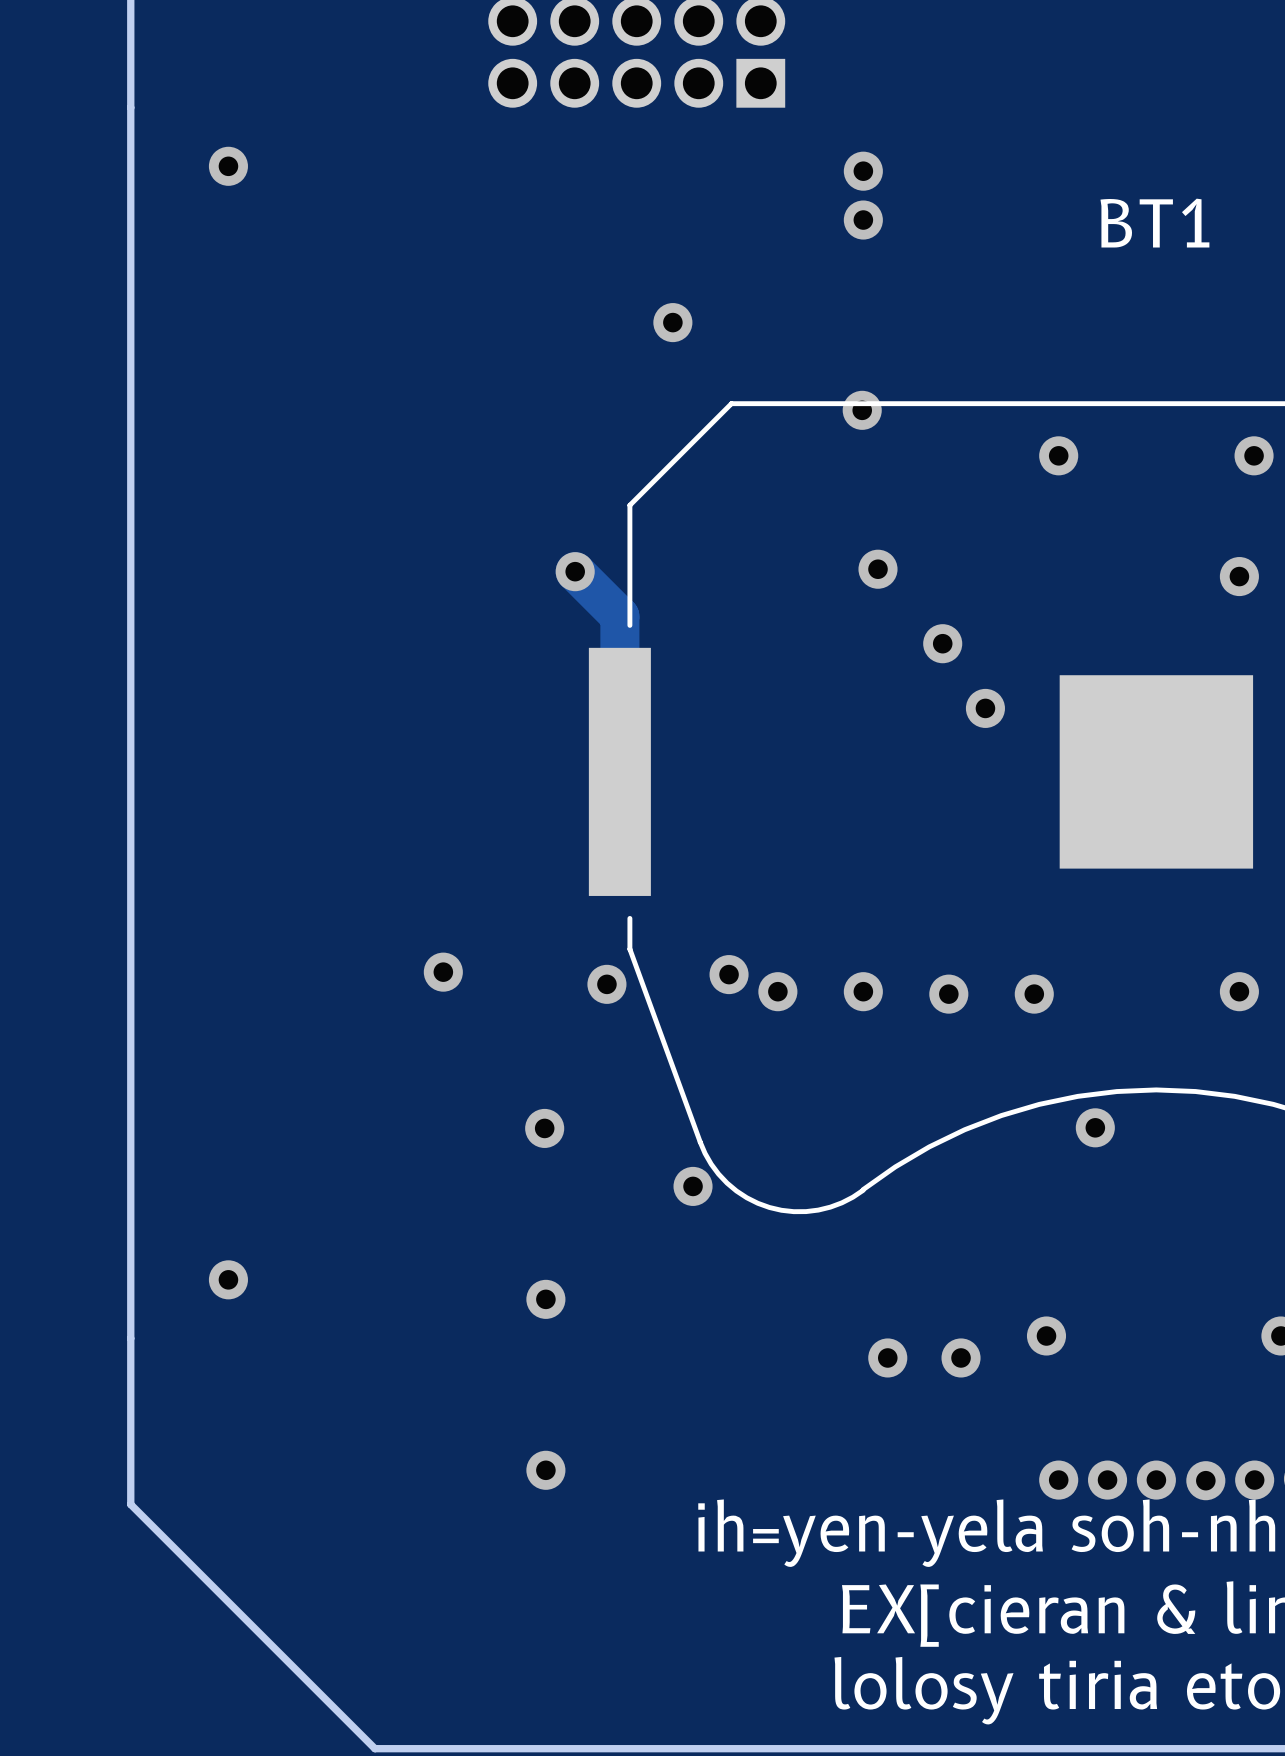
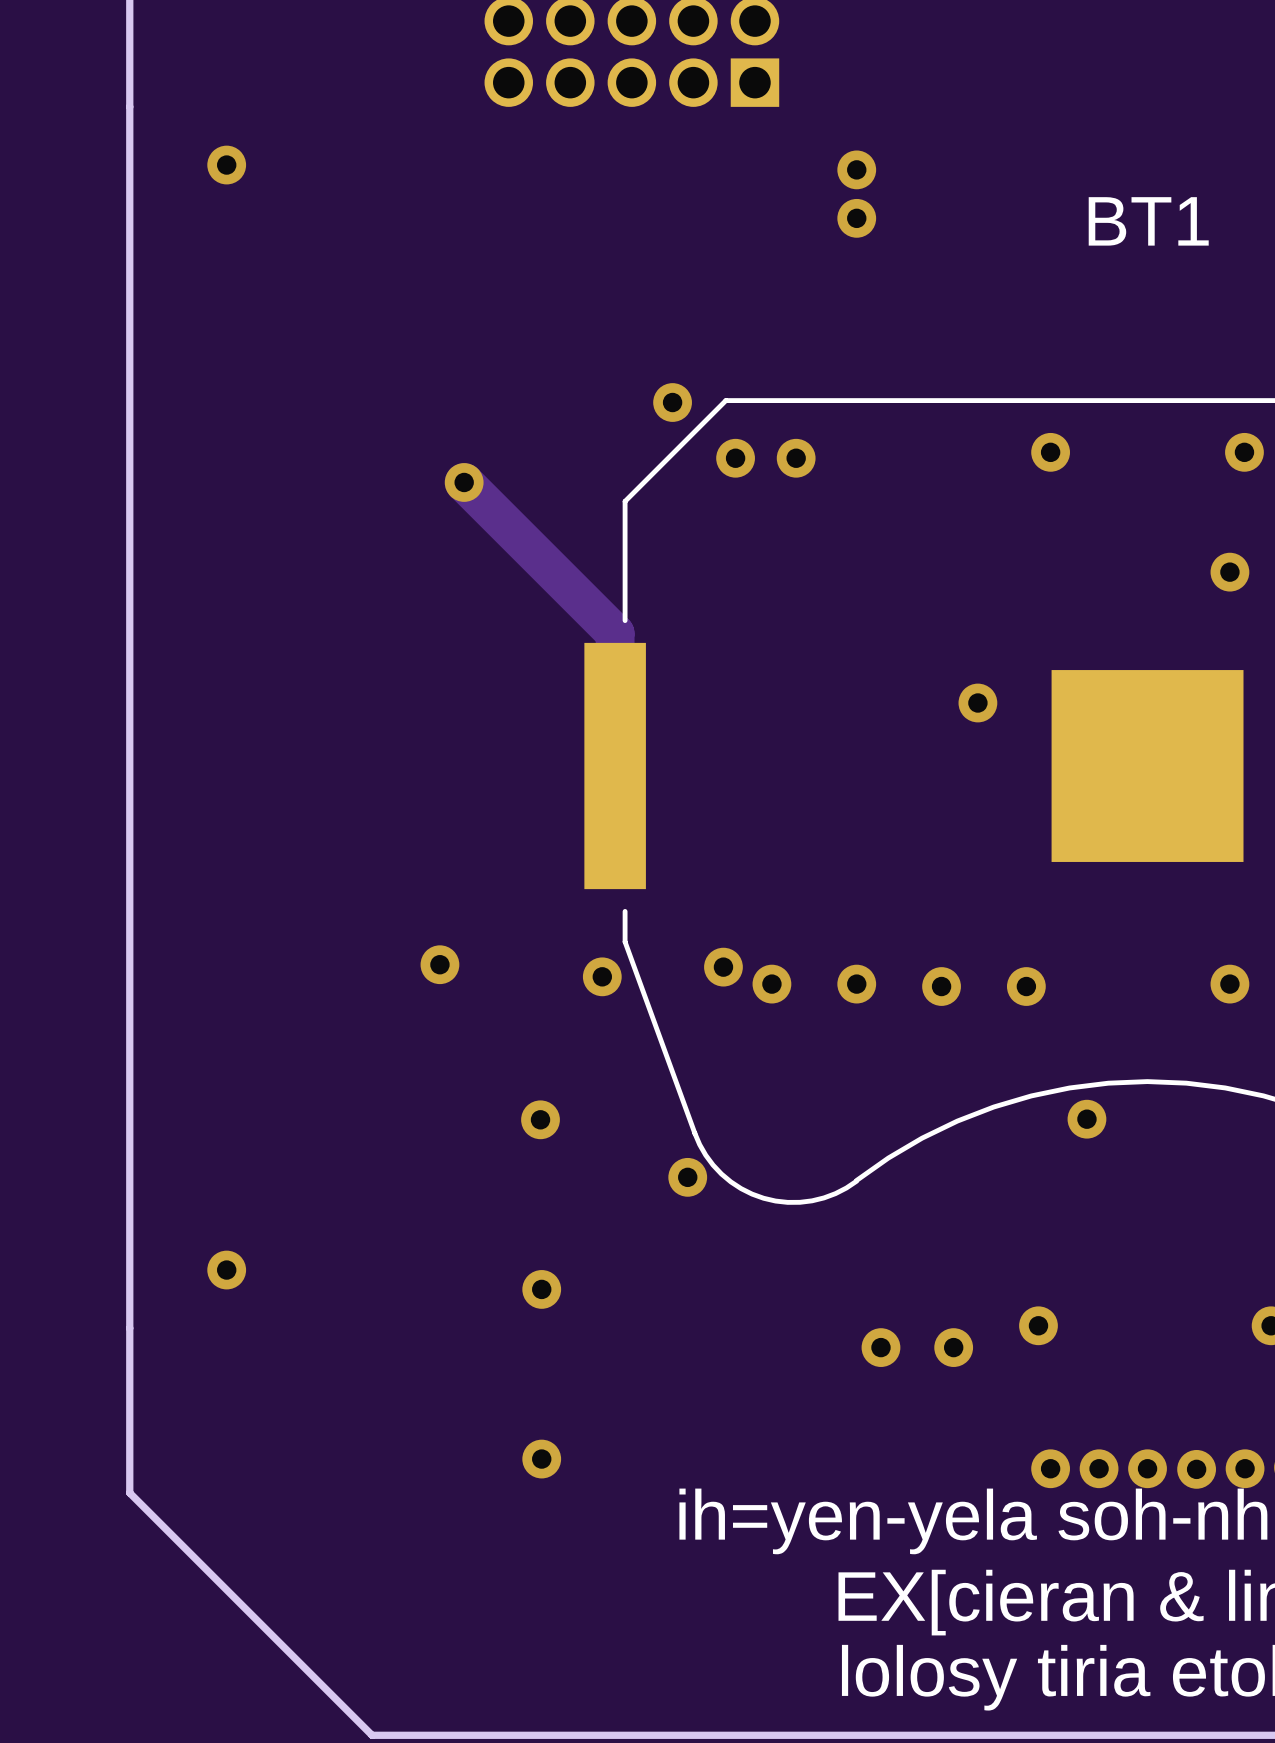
via: (672, 322) -> none
via: none -> (672, 402)
via: (862, 410) -> none
via: none -> (735, 458)
via: none -> (796, 458)
via: none -> (464, 482)
via: (878, 569) -> none
track: (575, 571) (619, 616) (619, 638) -> (464, 482) (615, 633)
via: (575, 571) -> none
via: (942, 643) -> none

